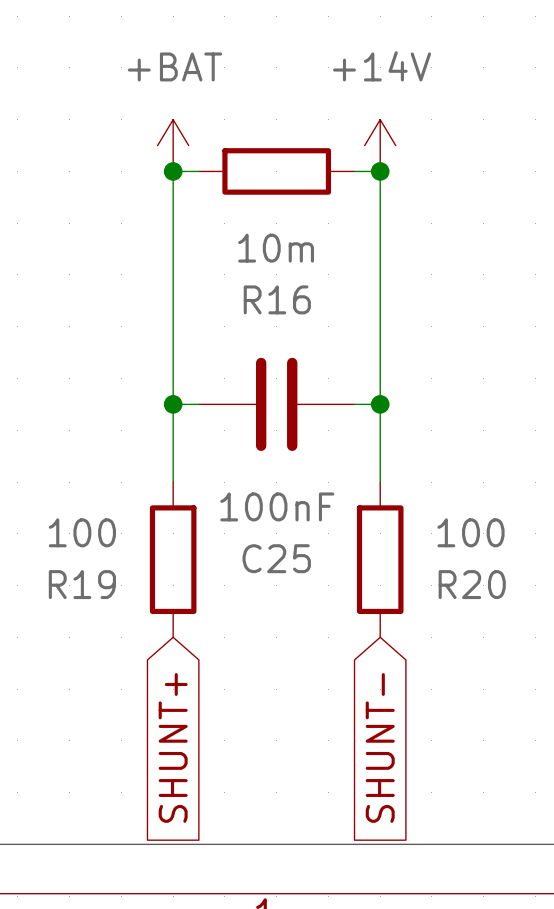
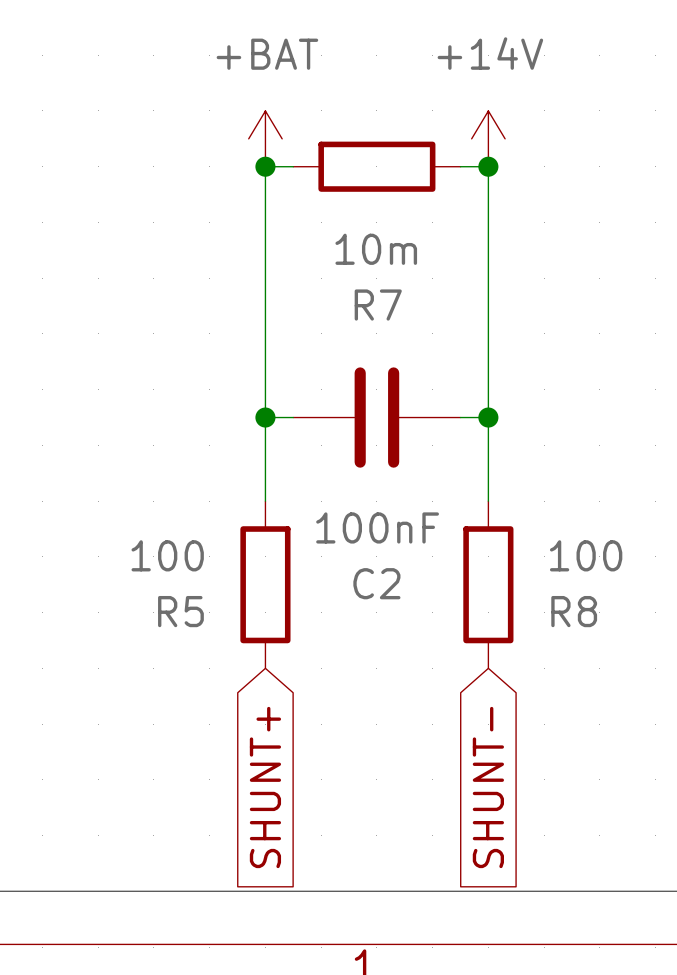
R16 name: R16 (277, 299) -> R7 (378, 305)
C25 name: C25 (276, 558) -> C2 (376, 583)
R19 name: R19 (82, 584) -> R5 (180, 611)
R20 name: R20 (472, 584) -> R8 (574, 611)

